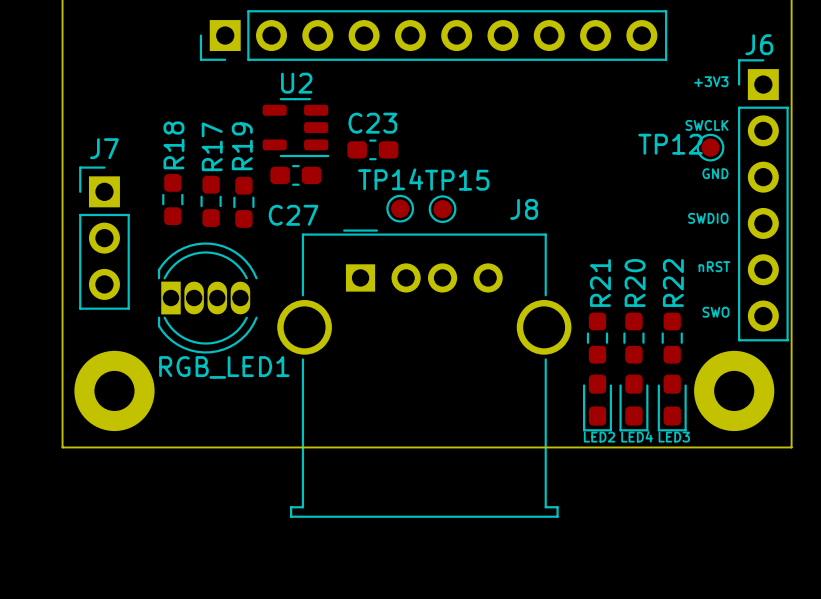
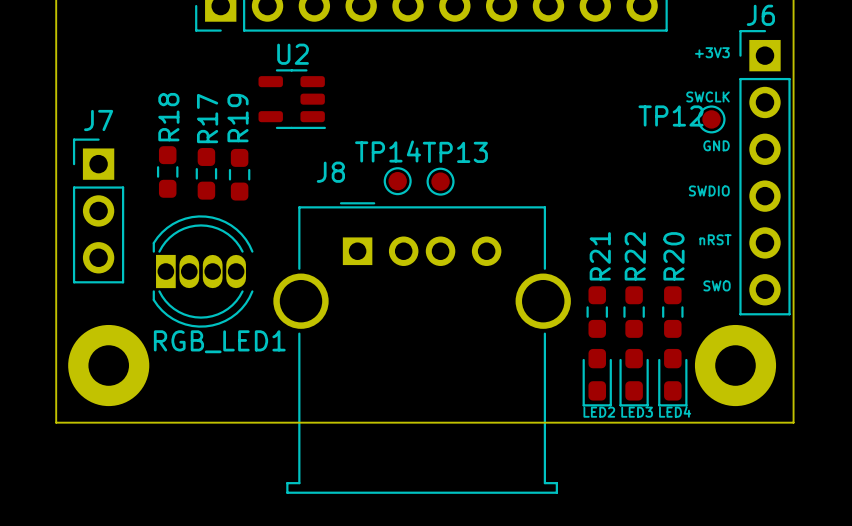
C23: (372, 149) -> none
C27: (295, 175) -> none
TP15 name: TP15 (457, 180) -> TP13 (455, 152)
J8 name position: J8 (524, 209) -> J8 (330, 172)
R20 name: R20 (635, 282) -> R22 (635, 256)
R22 name: R22 (673, 282) -> R20 (673, 256)
LED4 name: LED4 (637, 436) -> LED3 (637, 412)
LED3 name: LED3 (674, 437) -> LED4 (675, 411)

